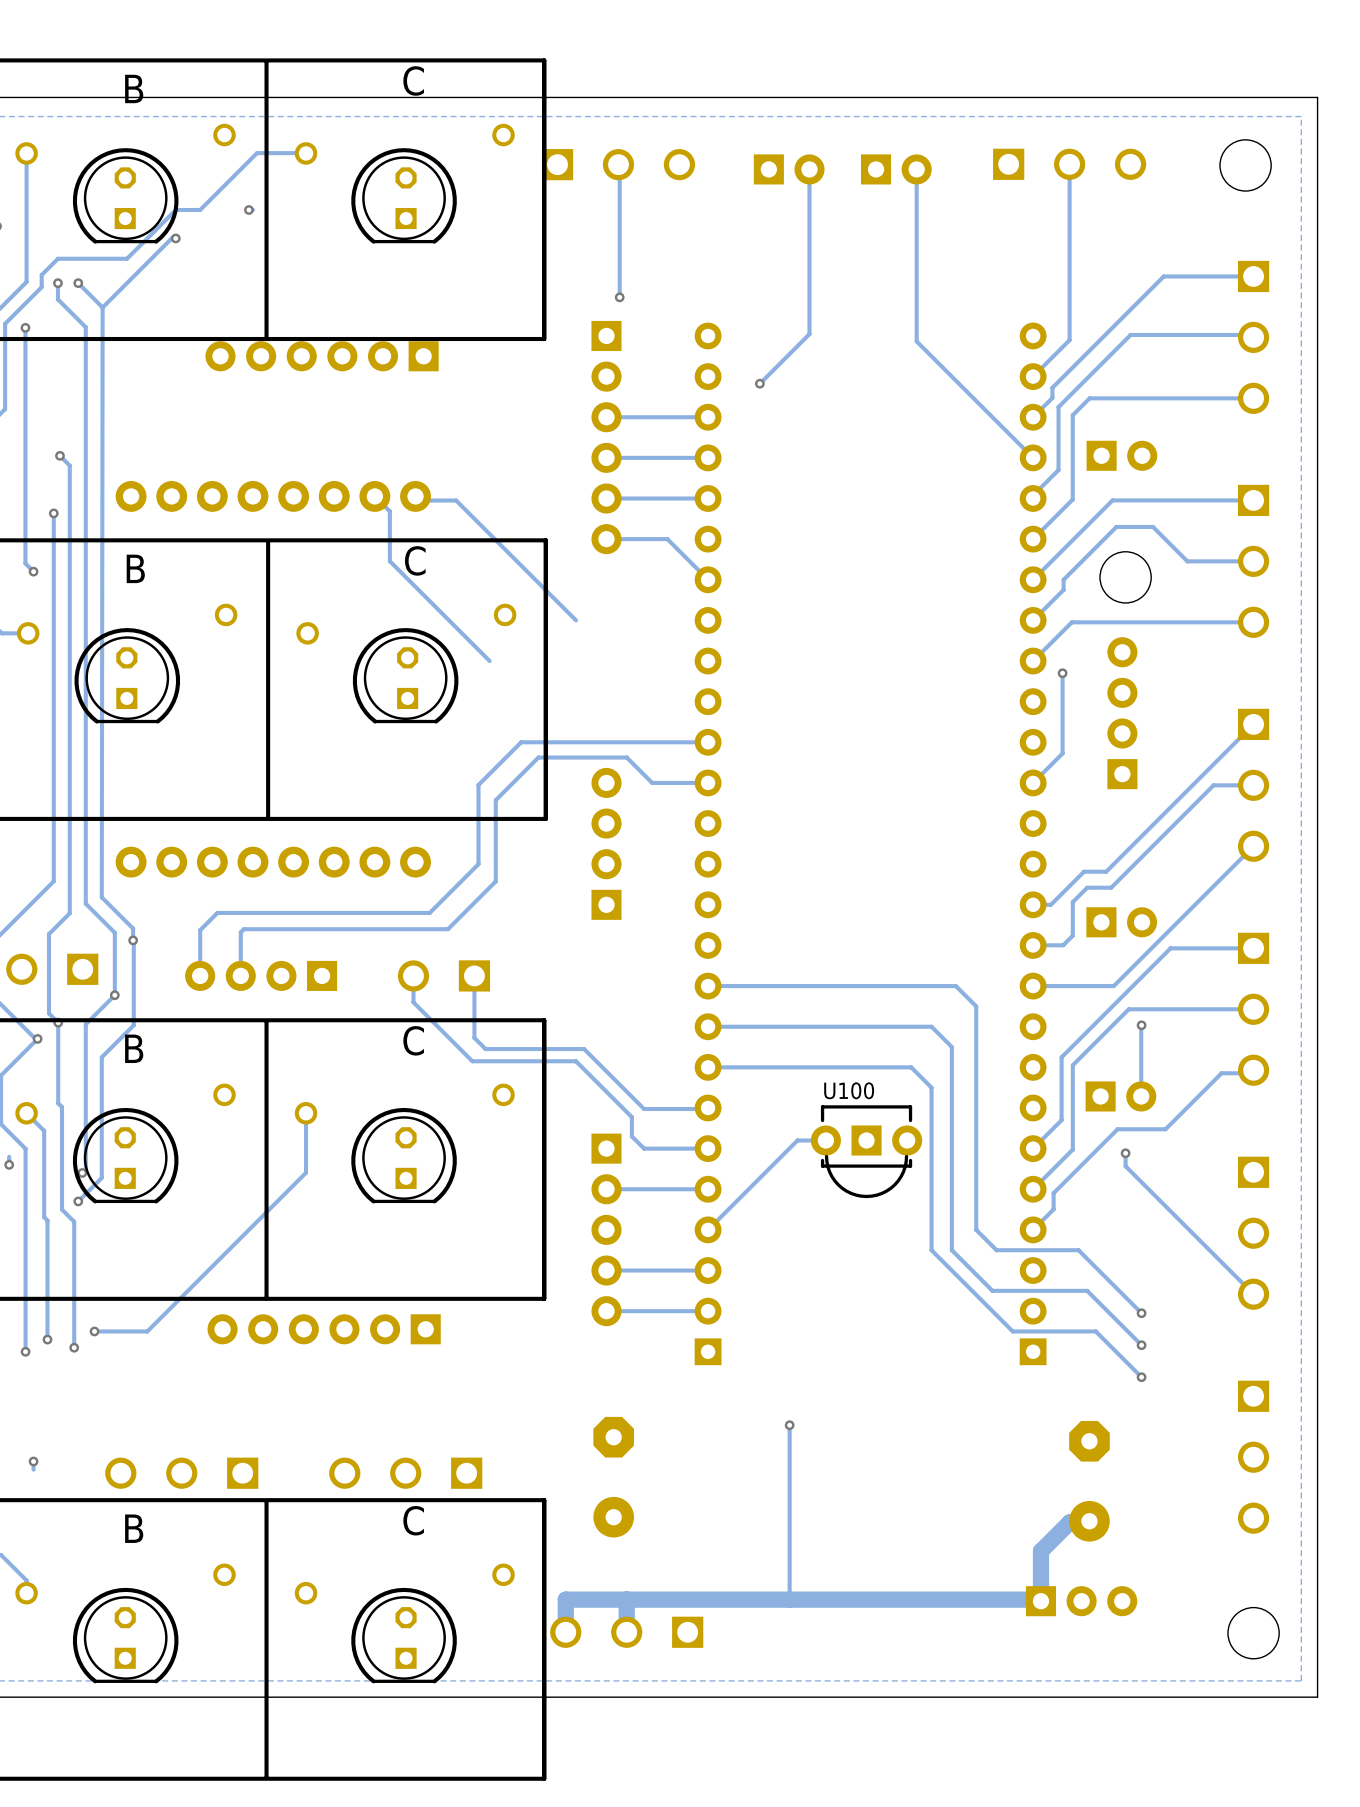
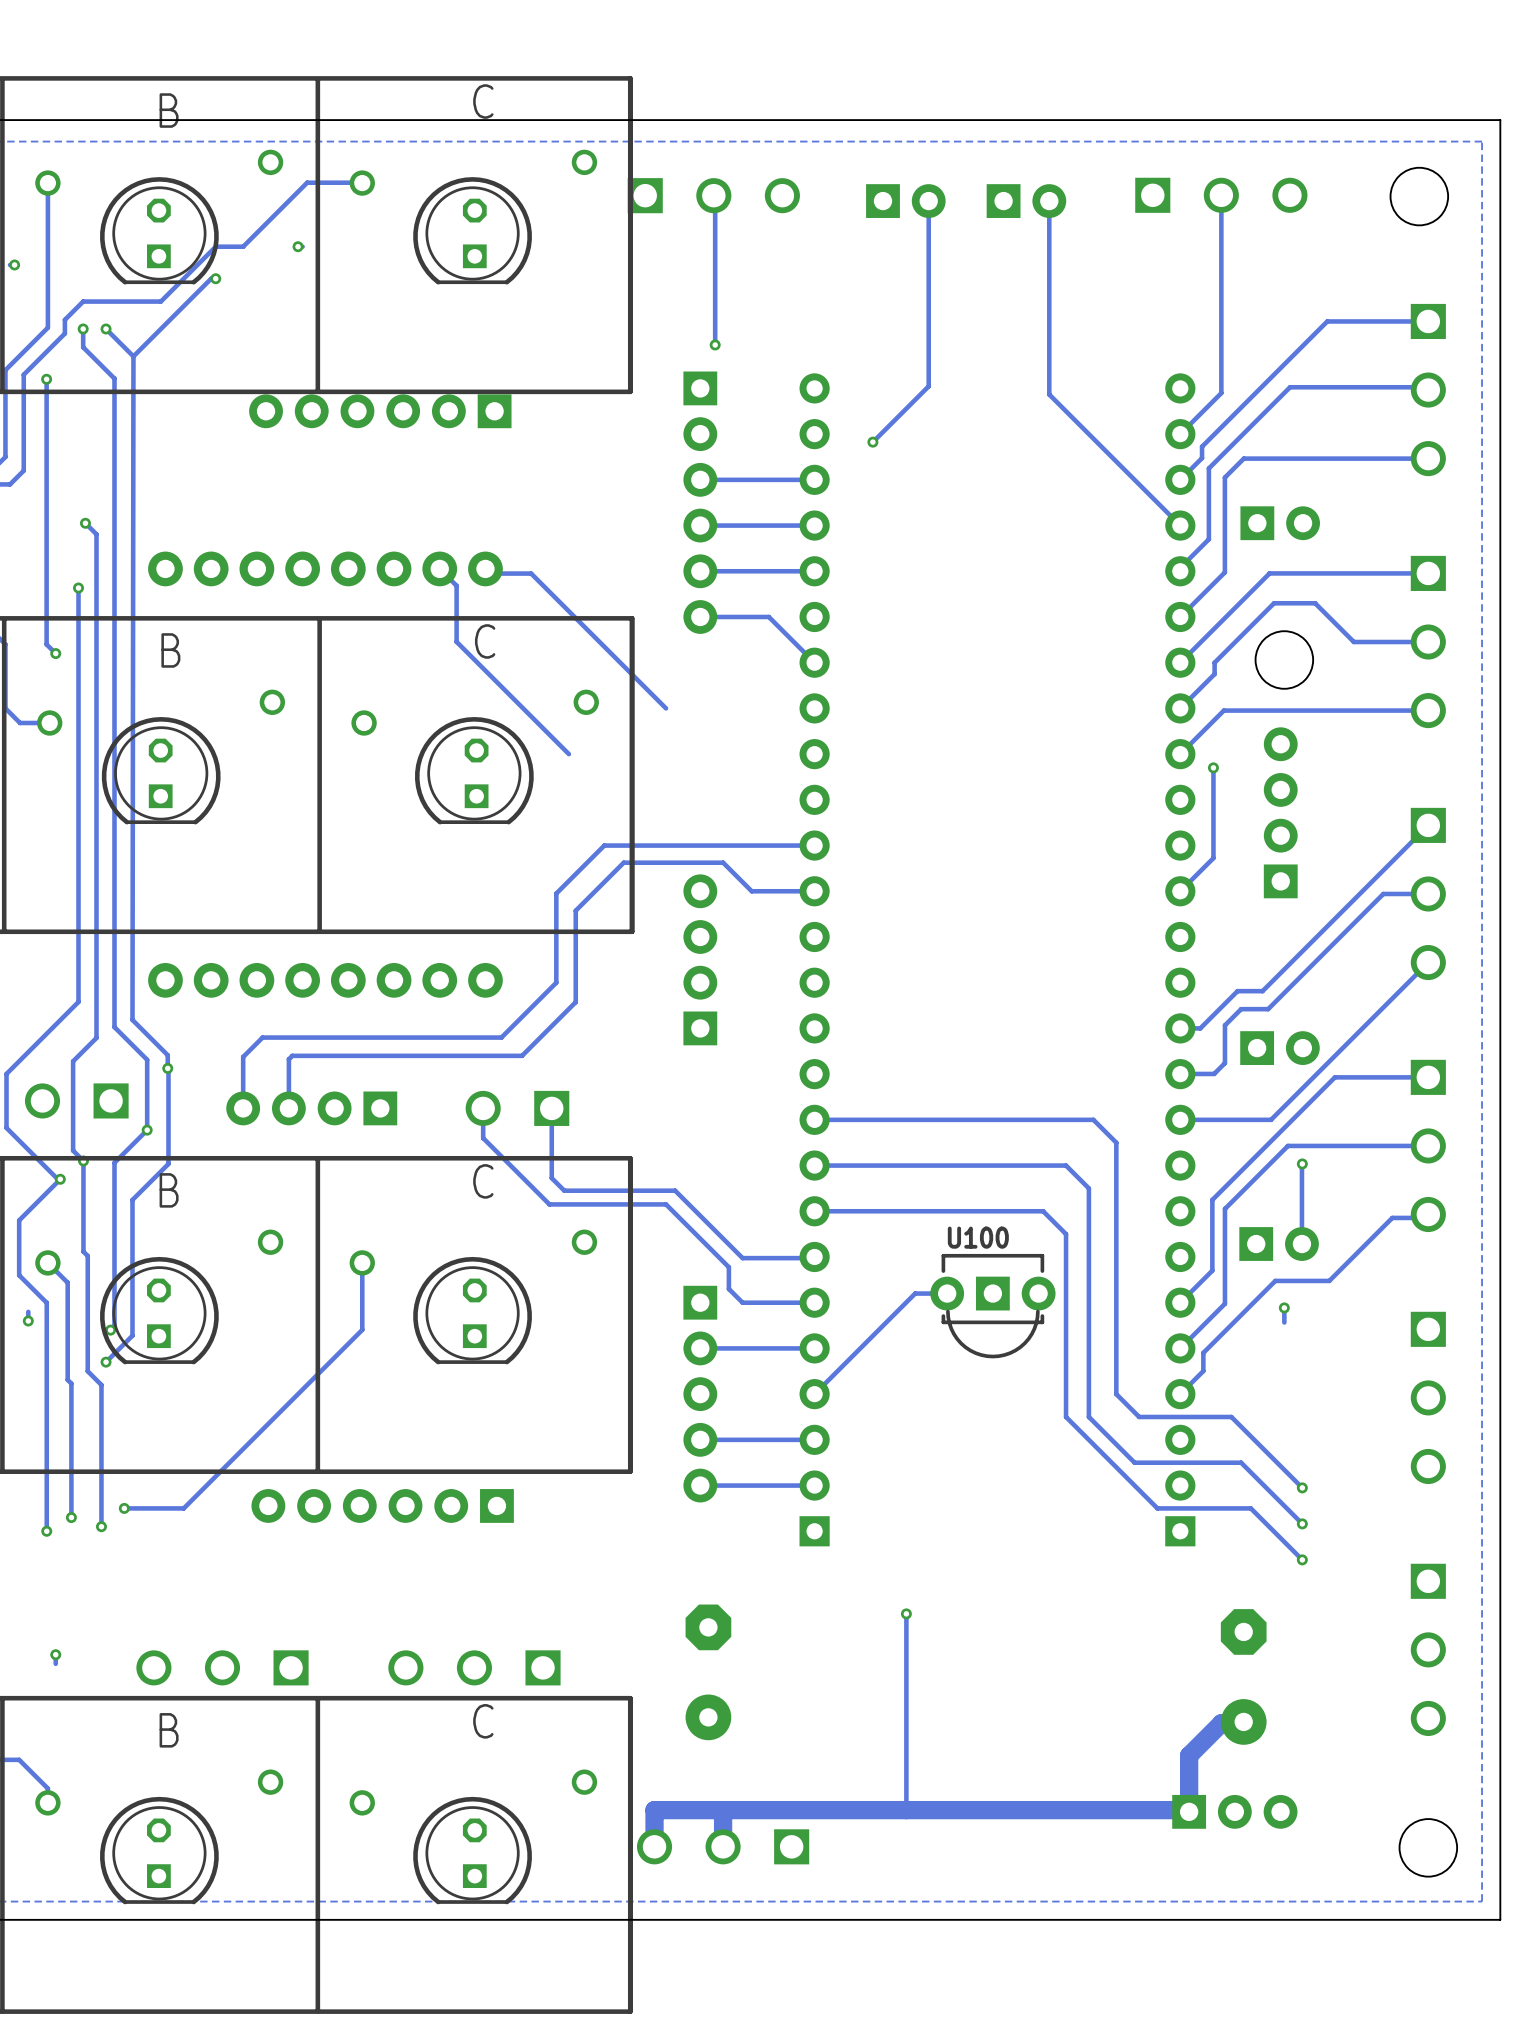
track: (1125, 1166) (1253, 1294) -> none

